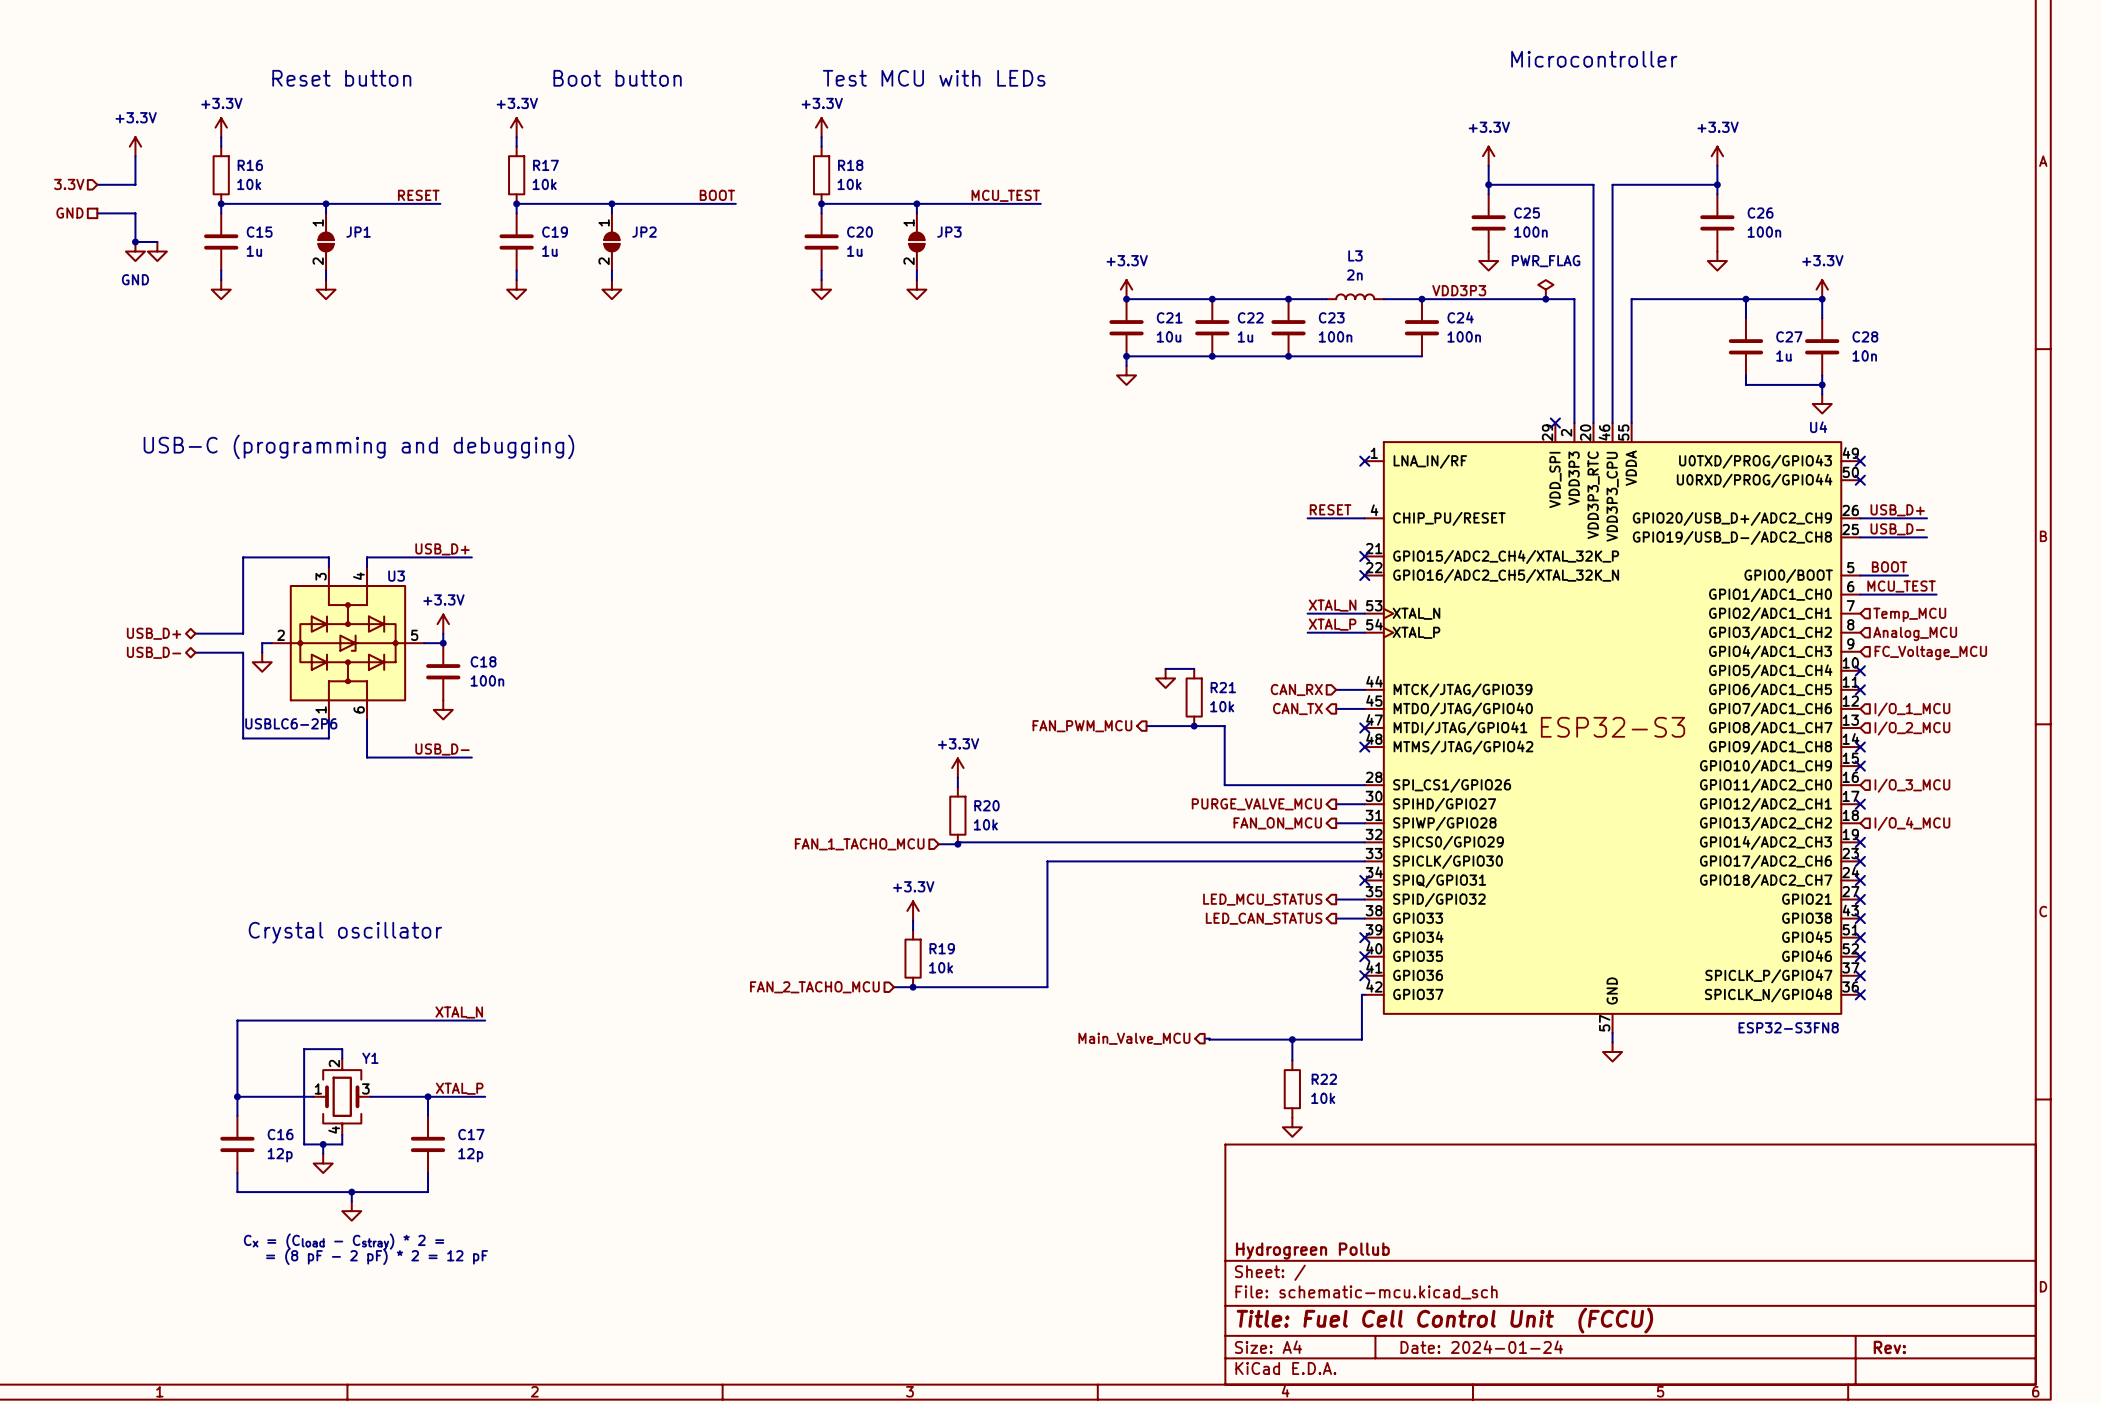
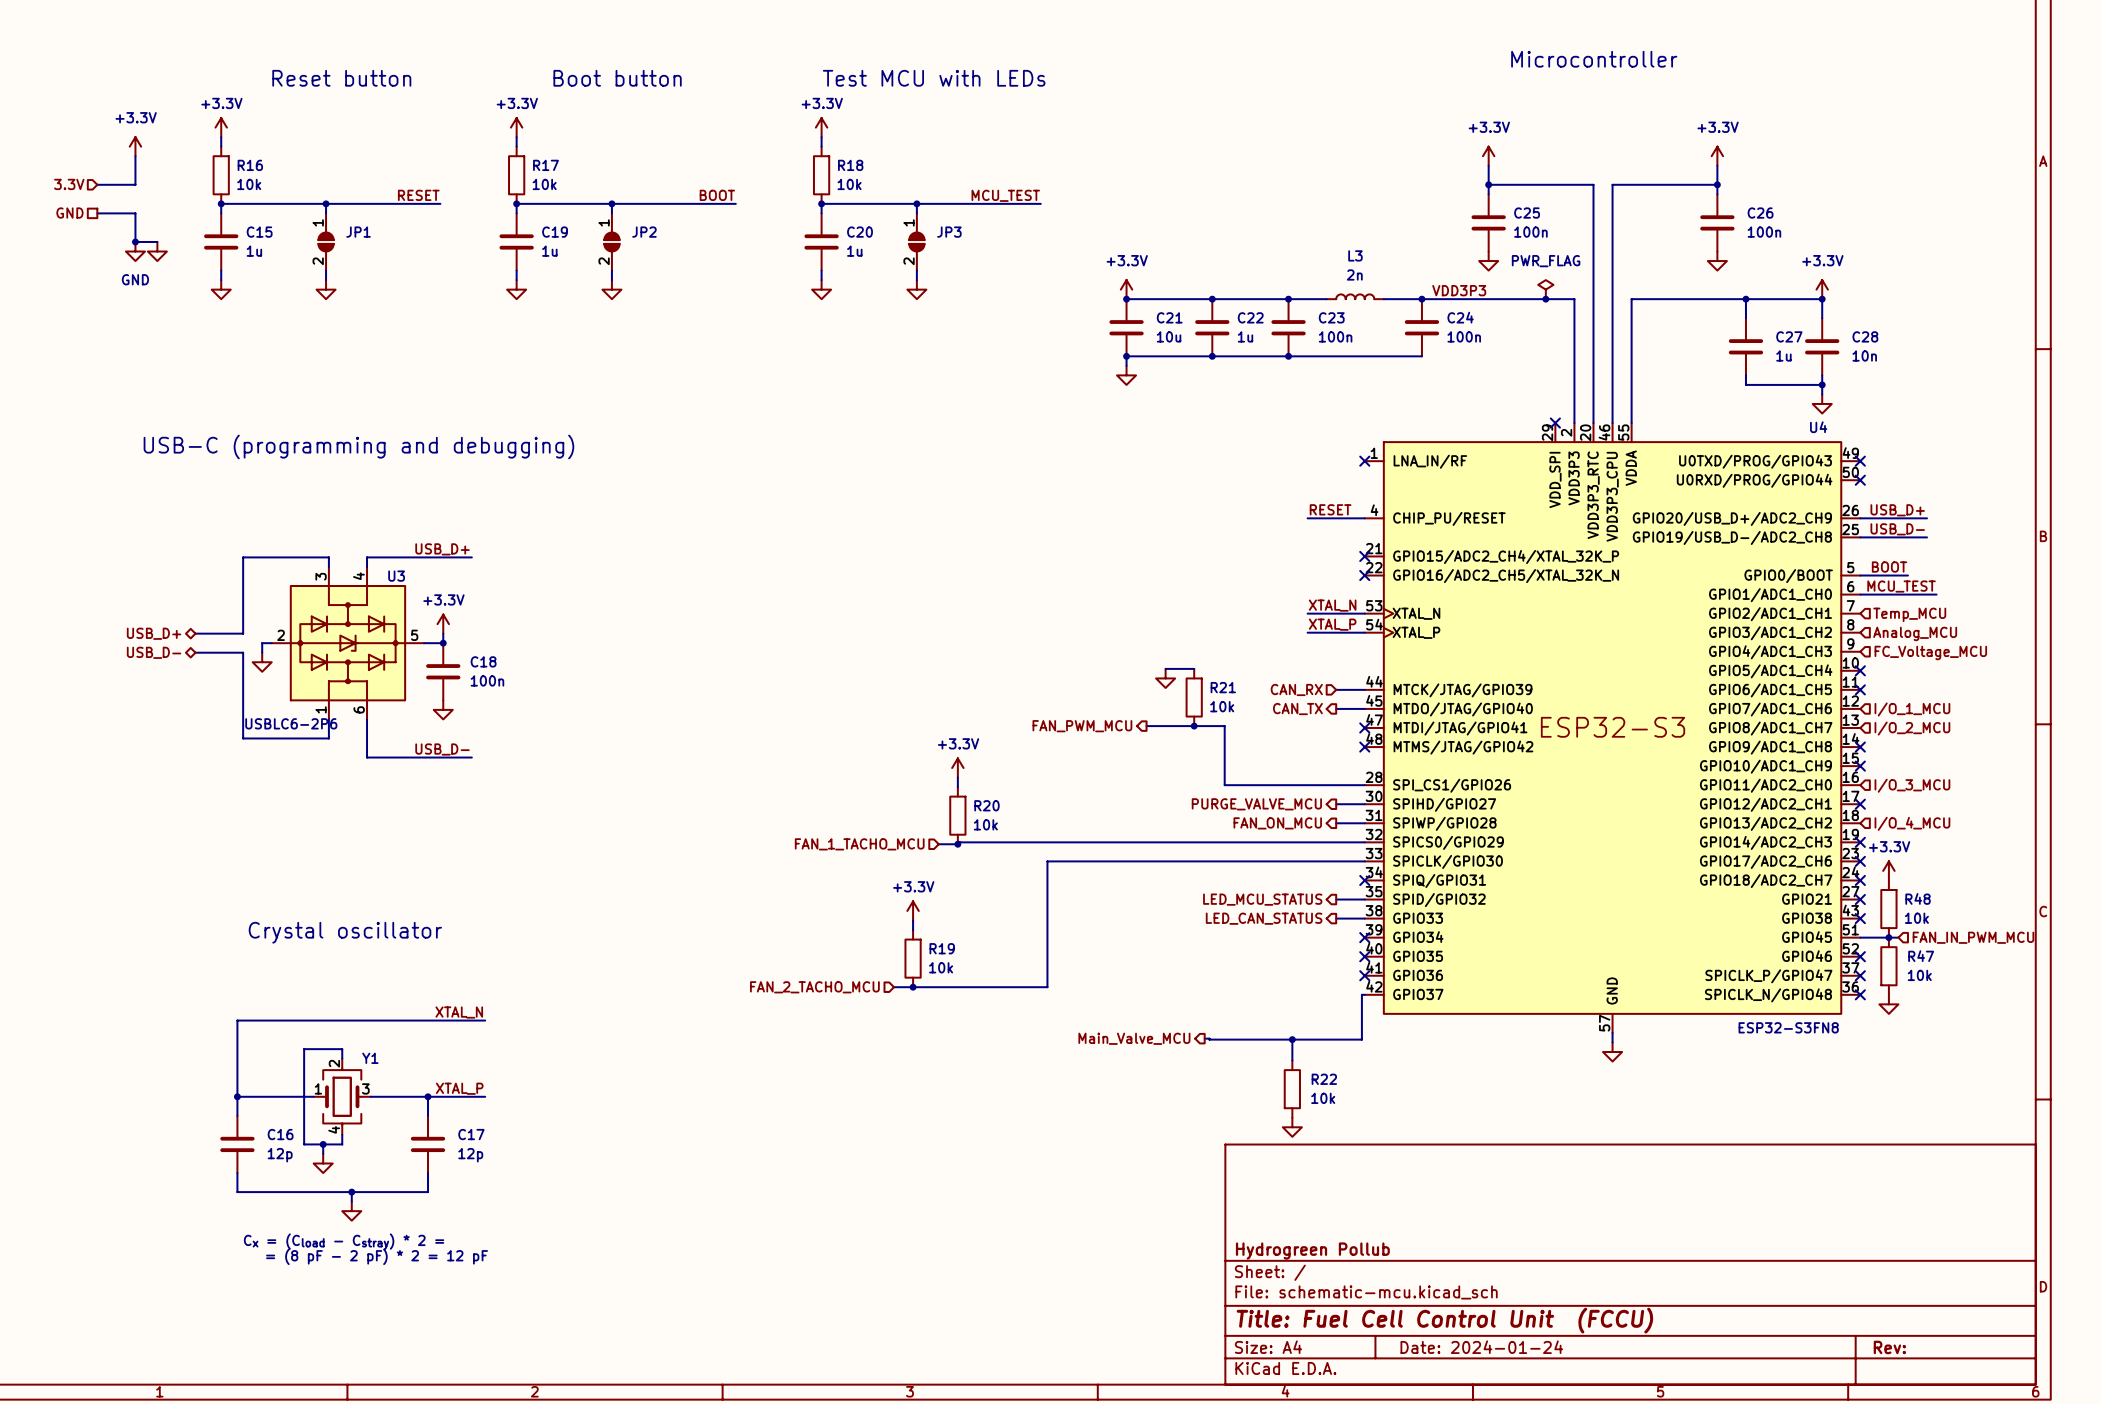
power symbol: none -> +3.3V (1888, 870)
R48: none -> 10k (1888, 909)
wire: none -> (1860, 937) (1898, 937)
no-connect mark: (1860, 937) -> none
junction: none -> (1888, 937)
hierarchical label: none -> FAN_IN_PWM_MCU (1973, 937)
R47: none -> 10k (1888, 966)
power symbol: none -> (1888, 1004)

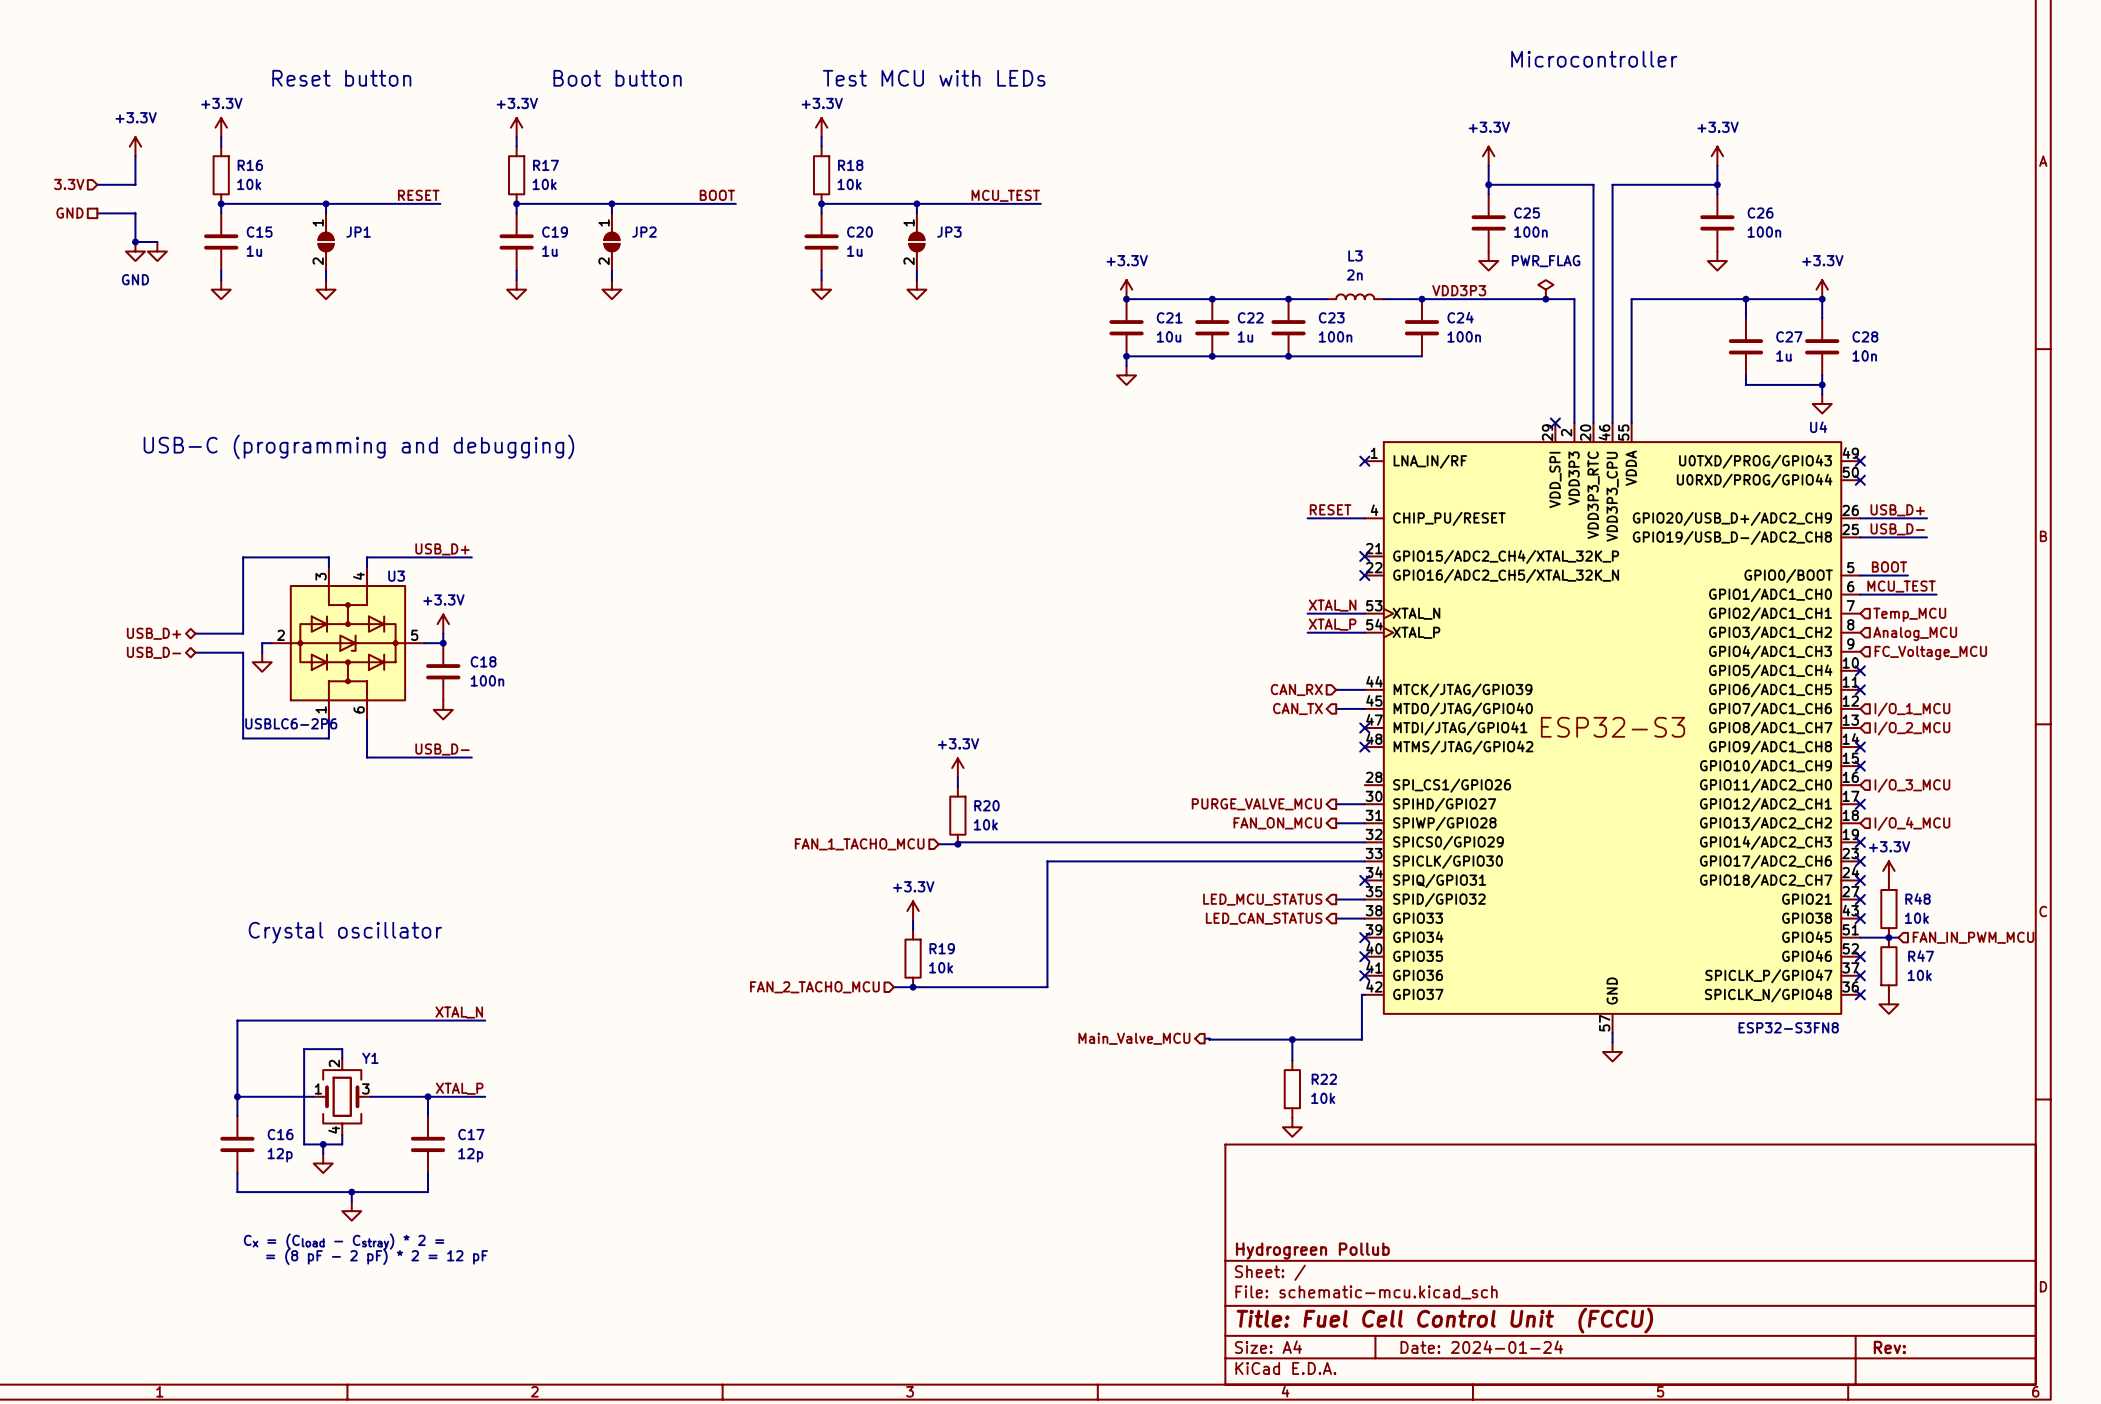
wire: (1165, 668) (1194, 668) -> none
power symbol: (1165, 678) -> none
R21: 10k (1194, 697) -> none
hierarchical label: FAN_PWM_MCU (1082, 726) -> none
wire: (1146, 726) (1224, 726) (1224, 785) (1364, 785) -> none
junction: (1194, 726) -> none

